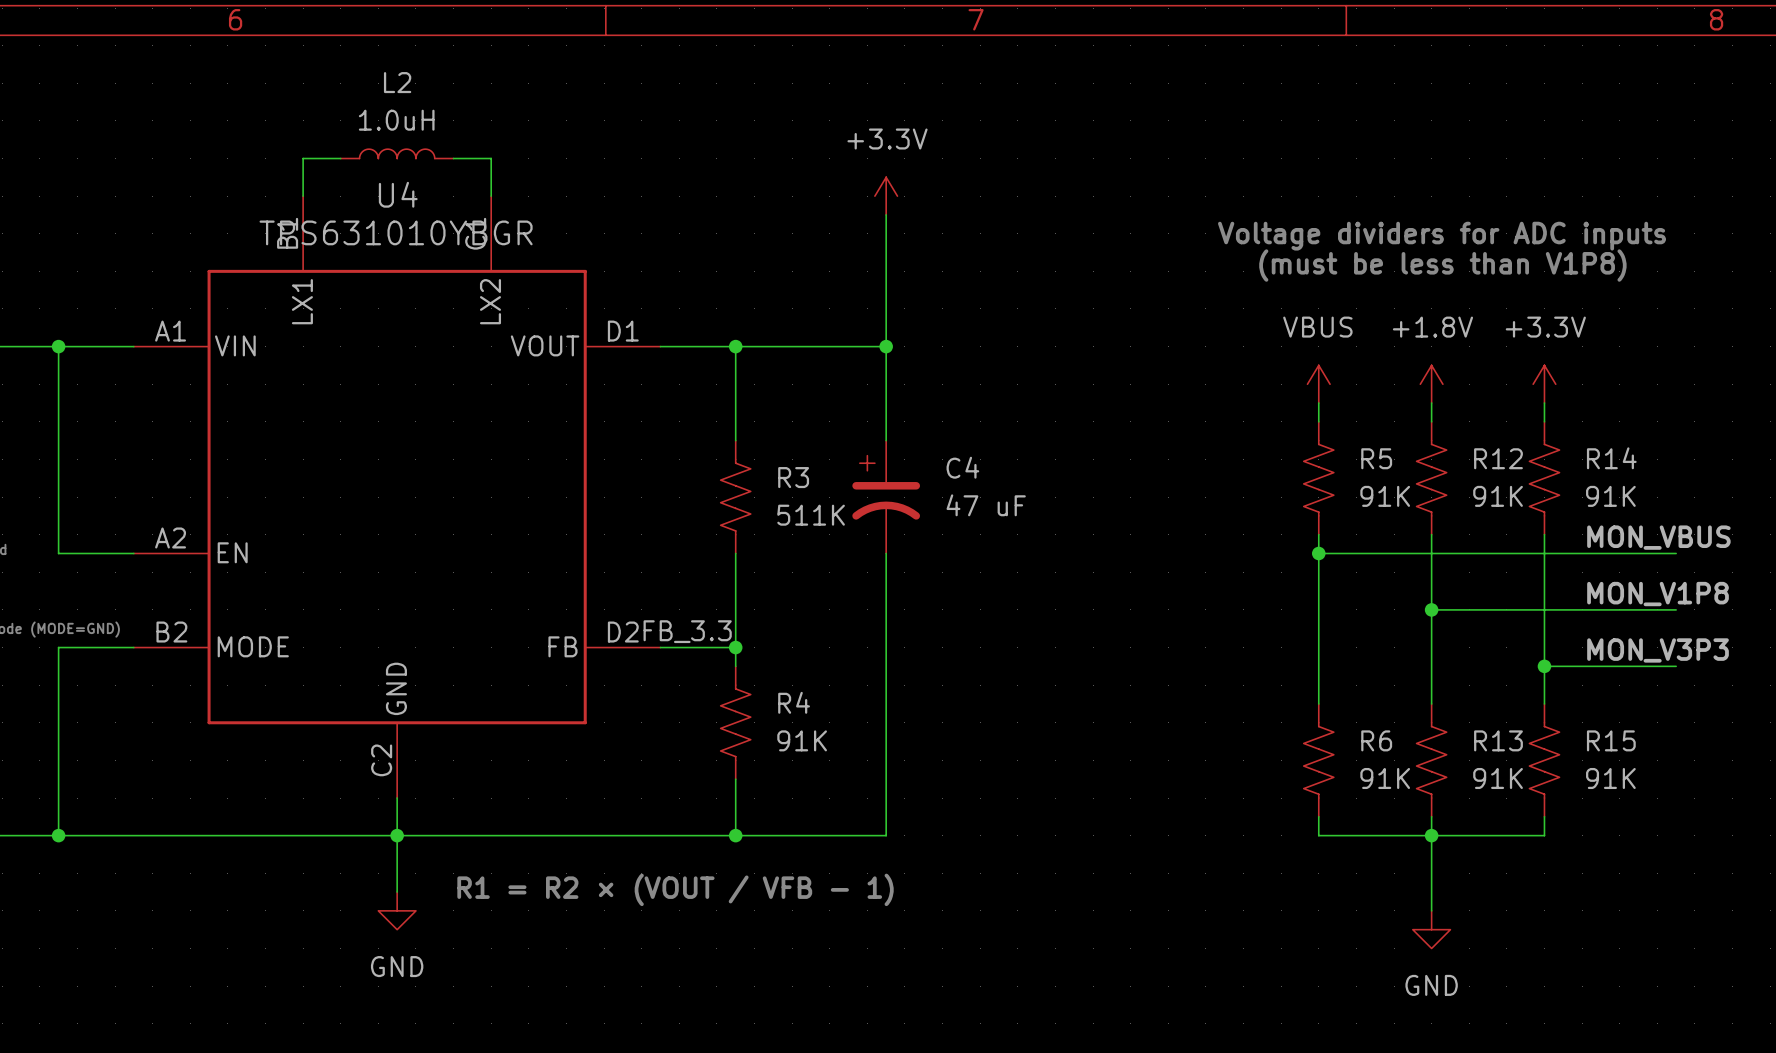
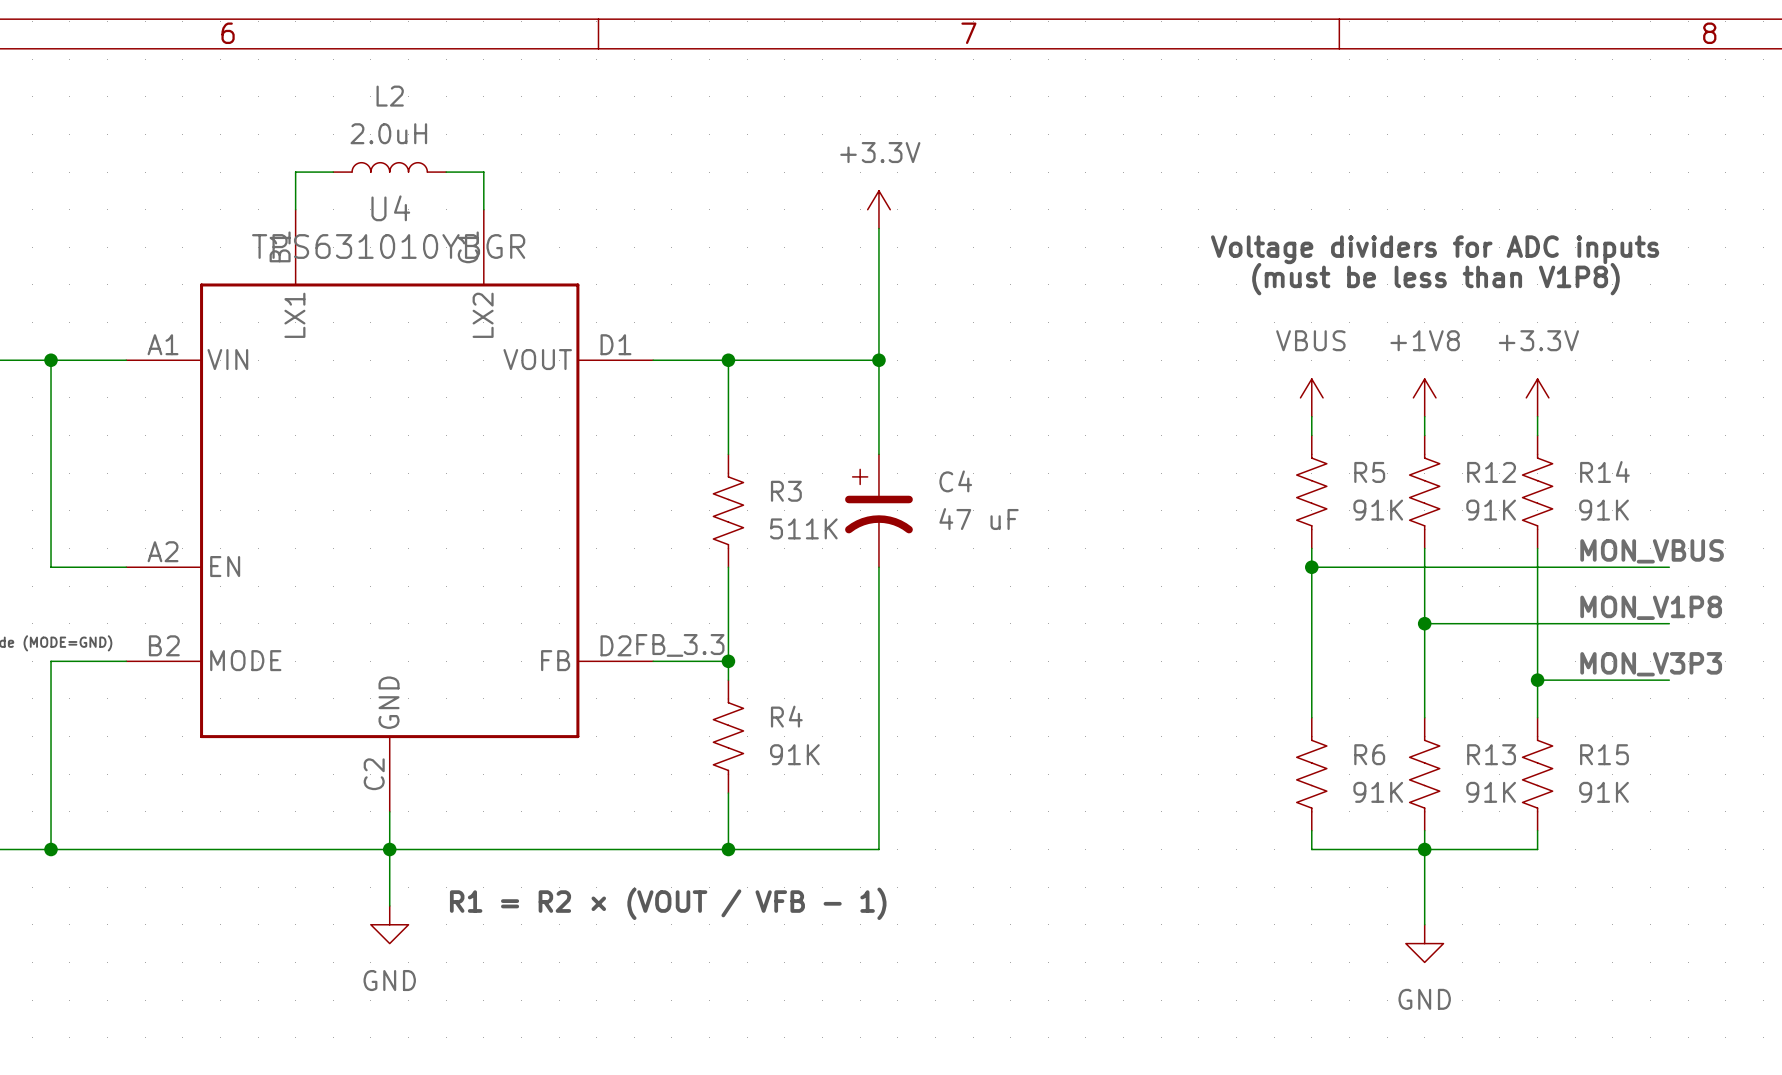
L2 value: 1.0uH (396, 120) -> 2.0uH (388, 133)
power symbol: +1.8V (1431, 384) -> +1V8 (1424, 397)

